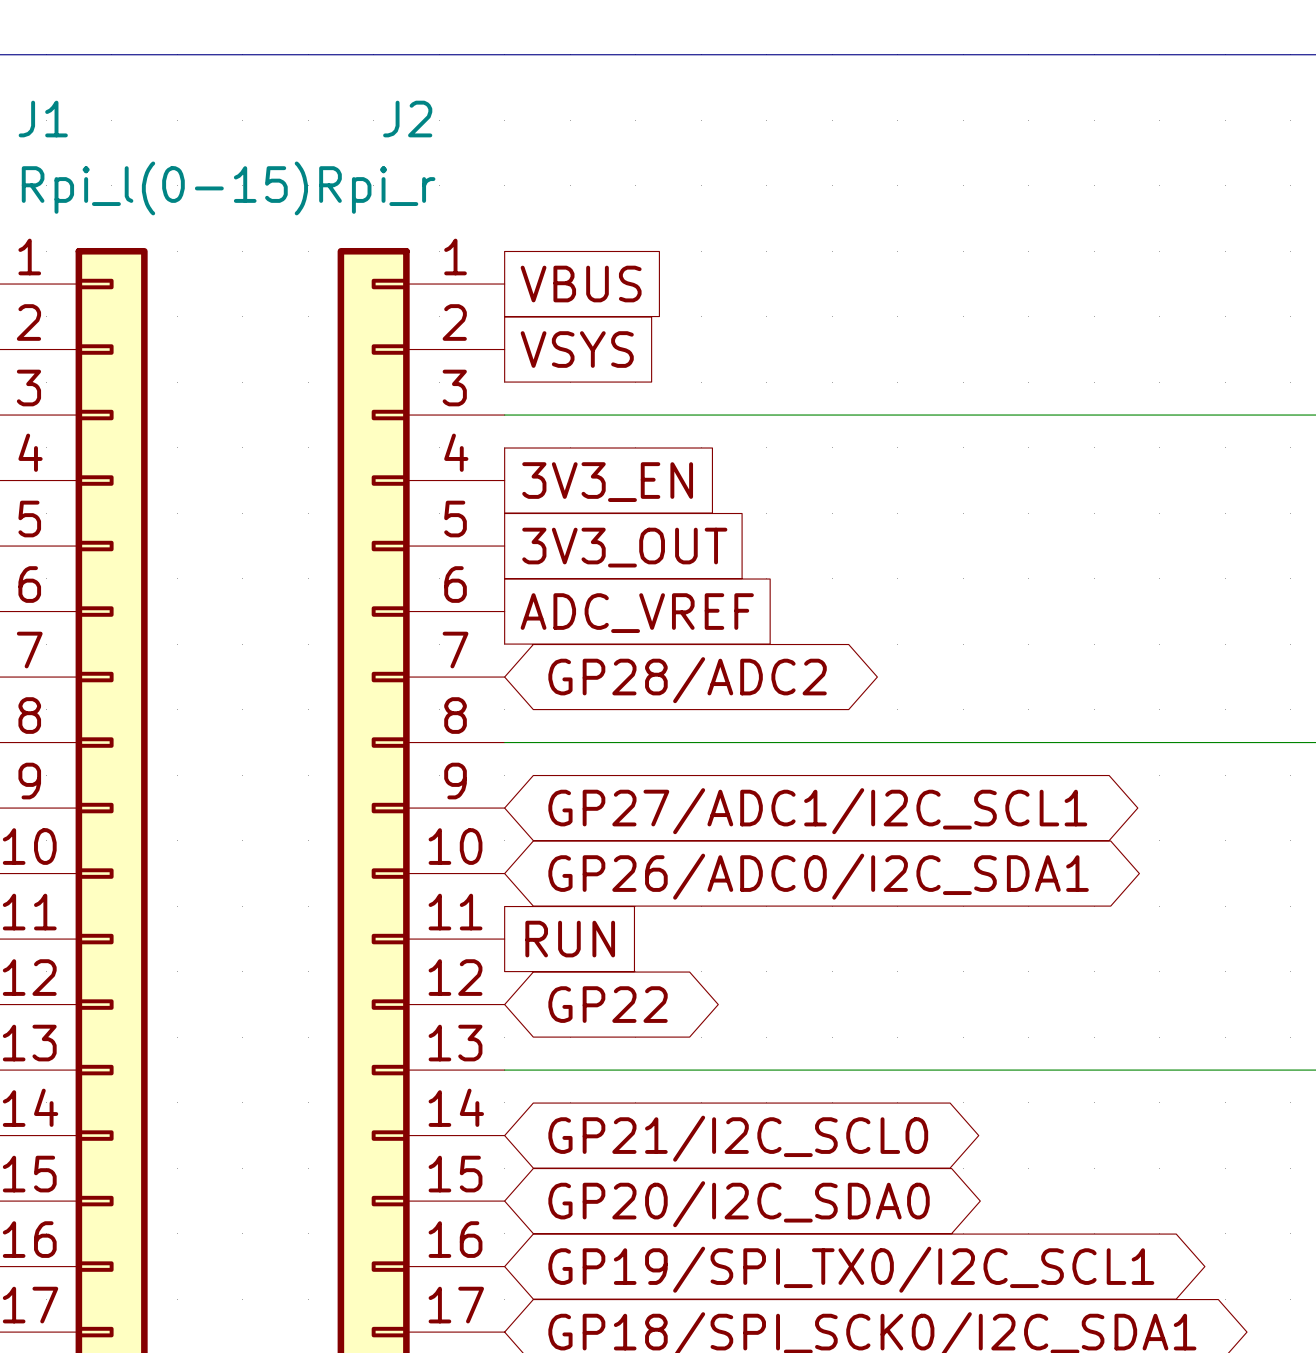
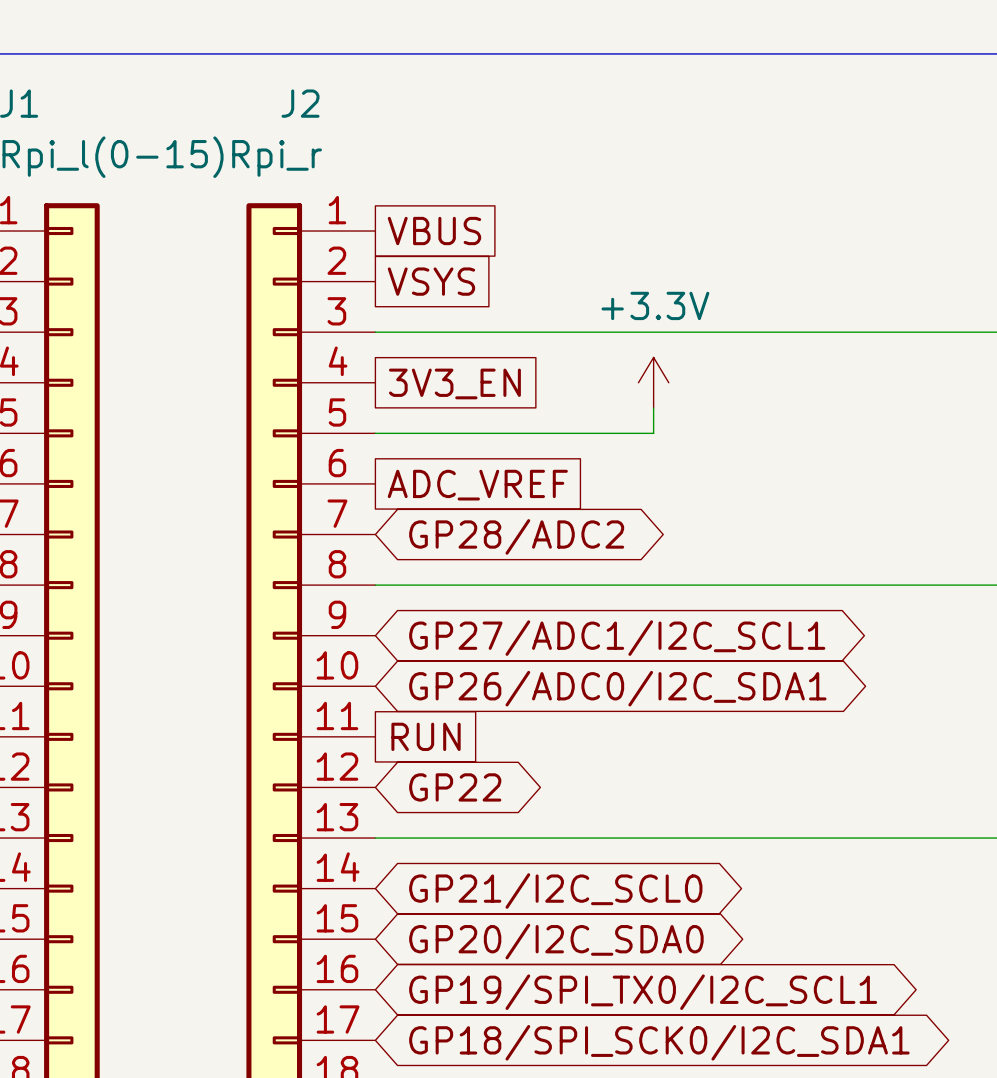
power symbol: none -> +3.3V (653, 382)
wire: none -> (653, 408) (653, 433) (375, 433)
global label: 3V3_OUT (624, 547) -> none

